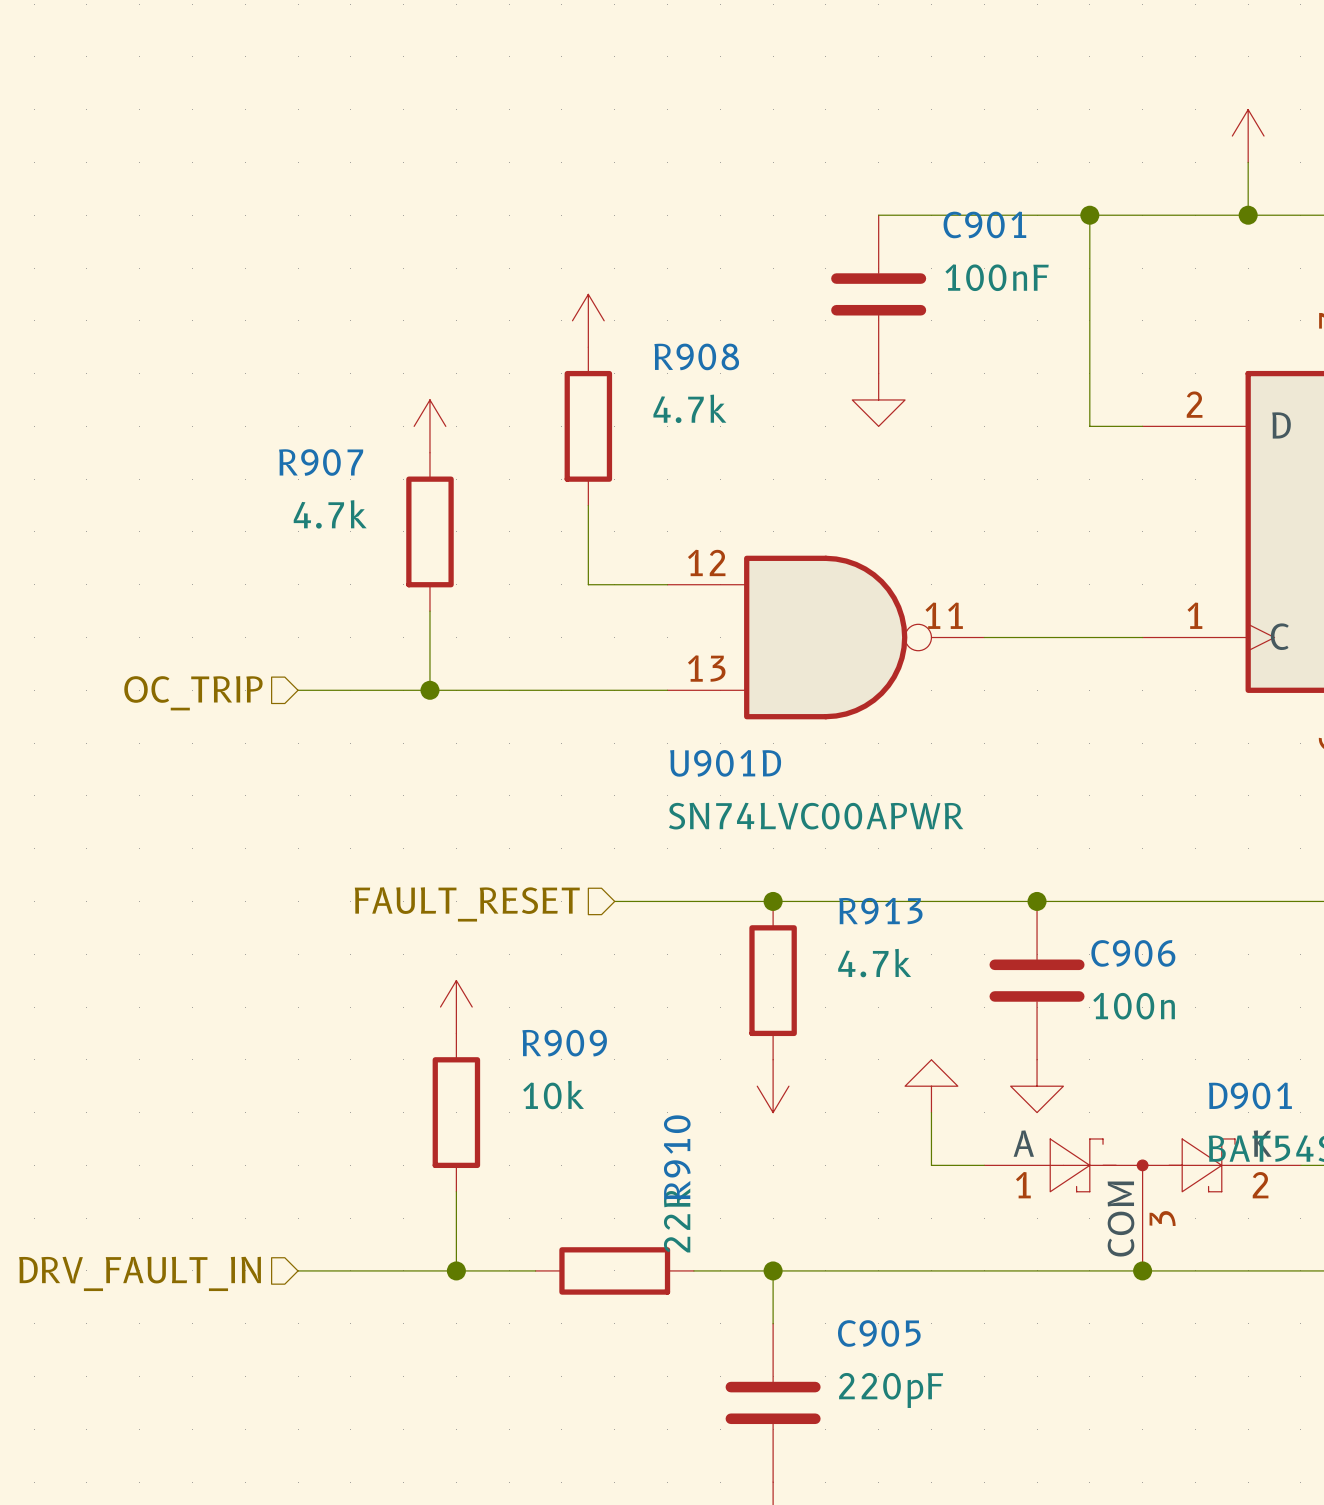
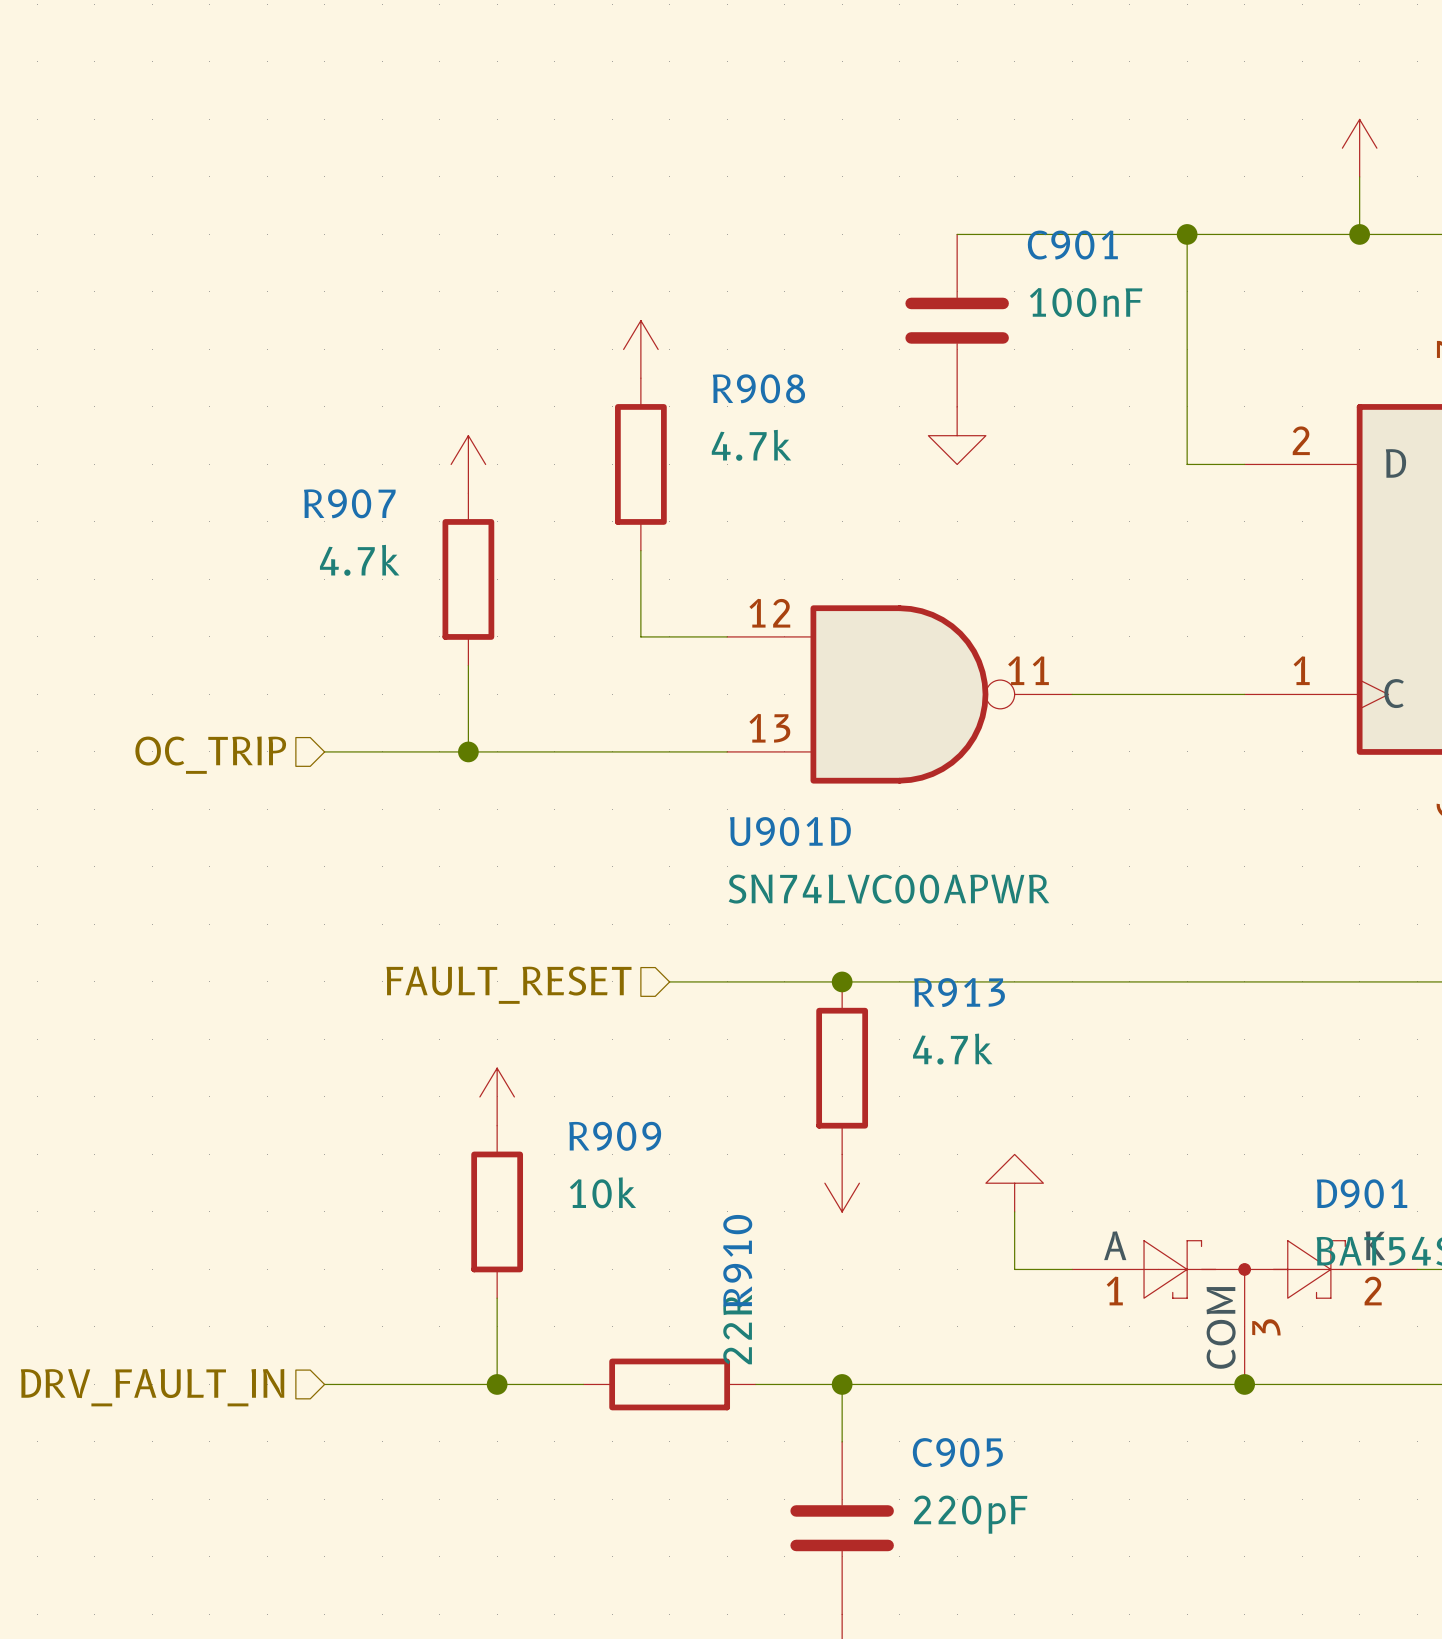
junction: (1037, 901) -> none
C906: 100n (1037, 980) -> none
power symbol: (1037, 1086) -> none

